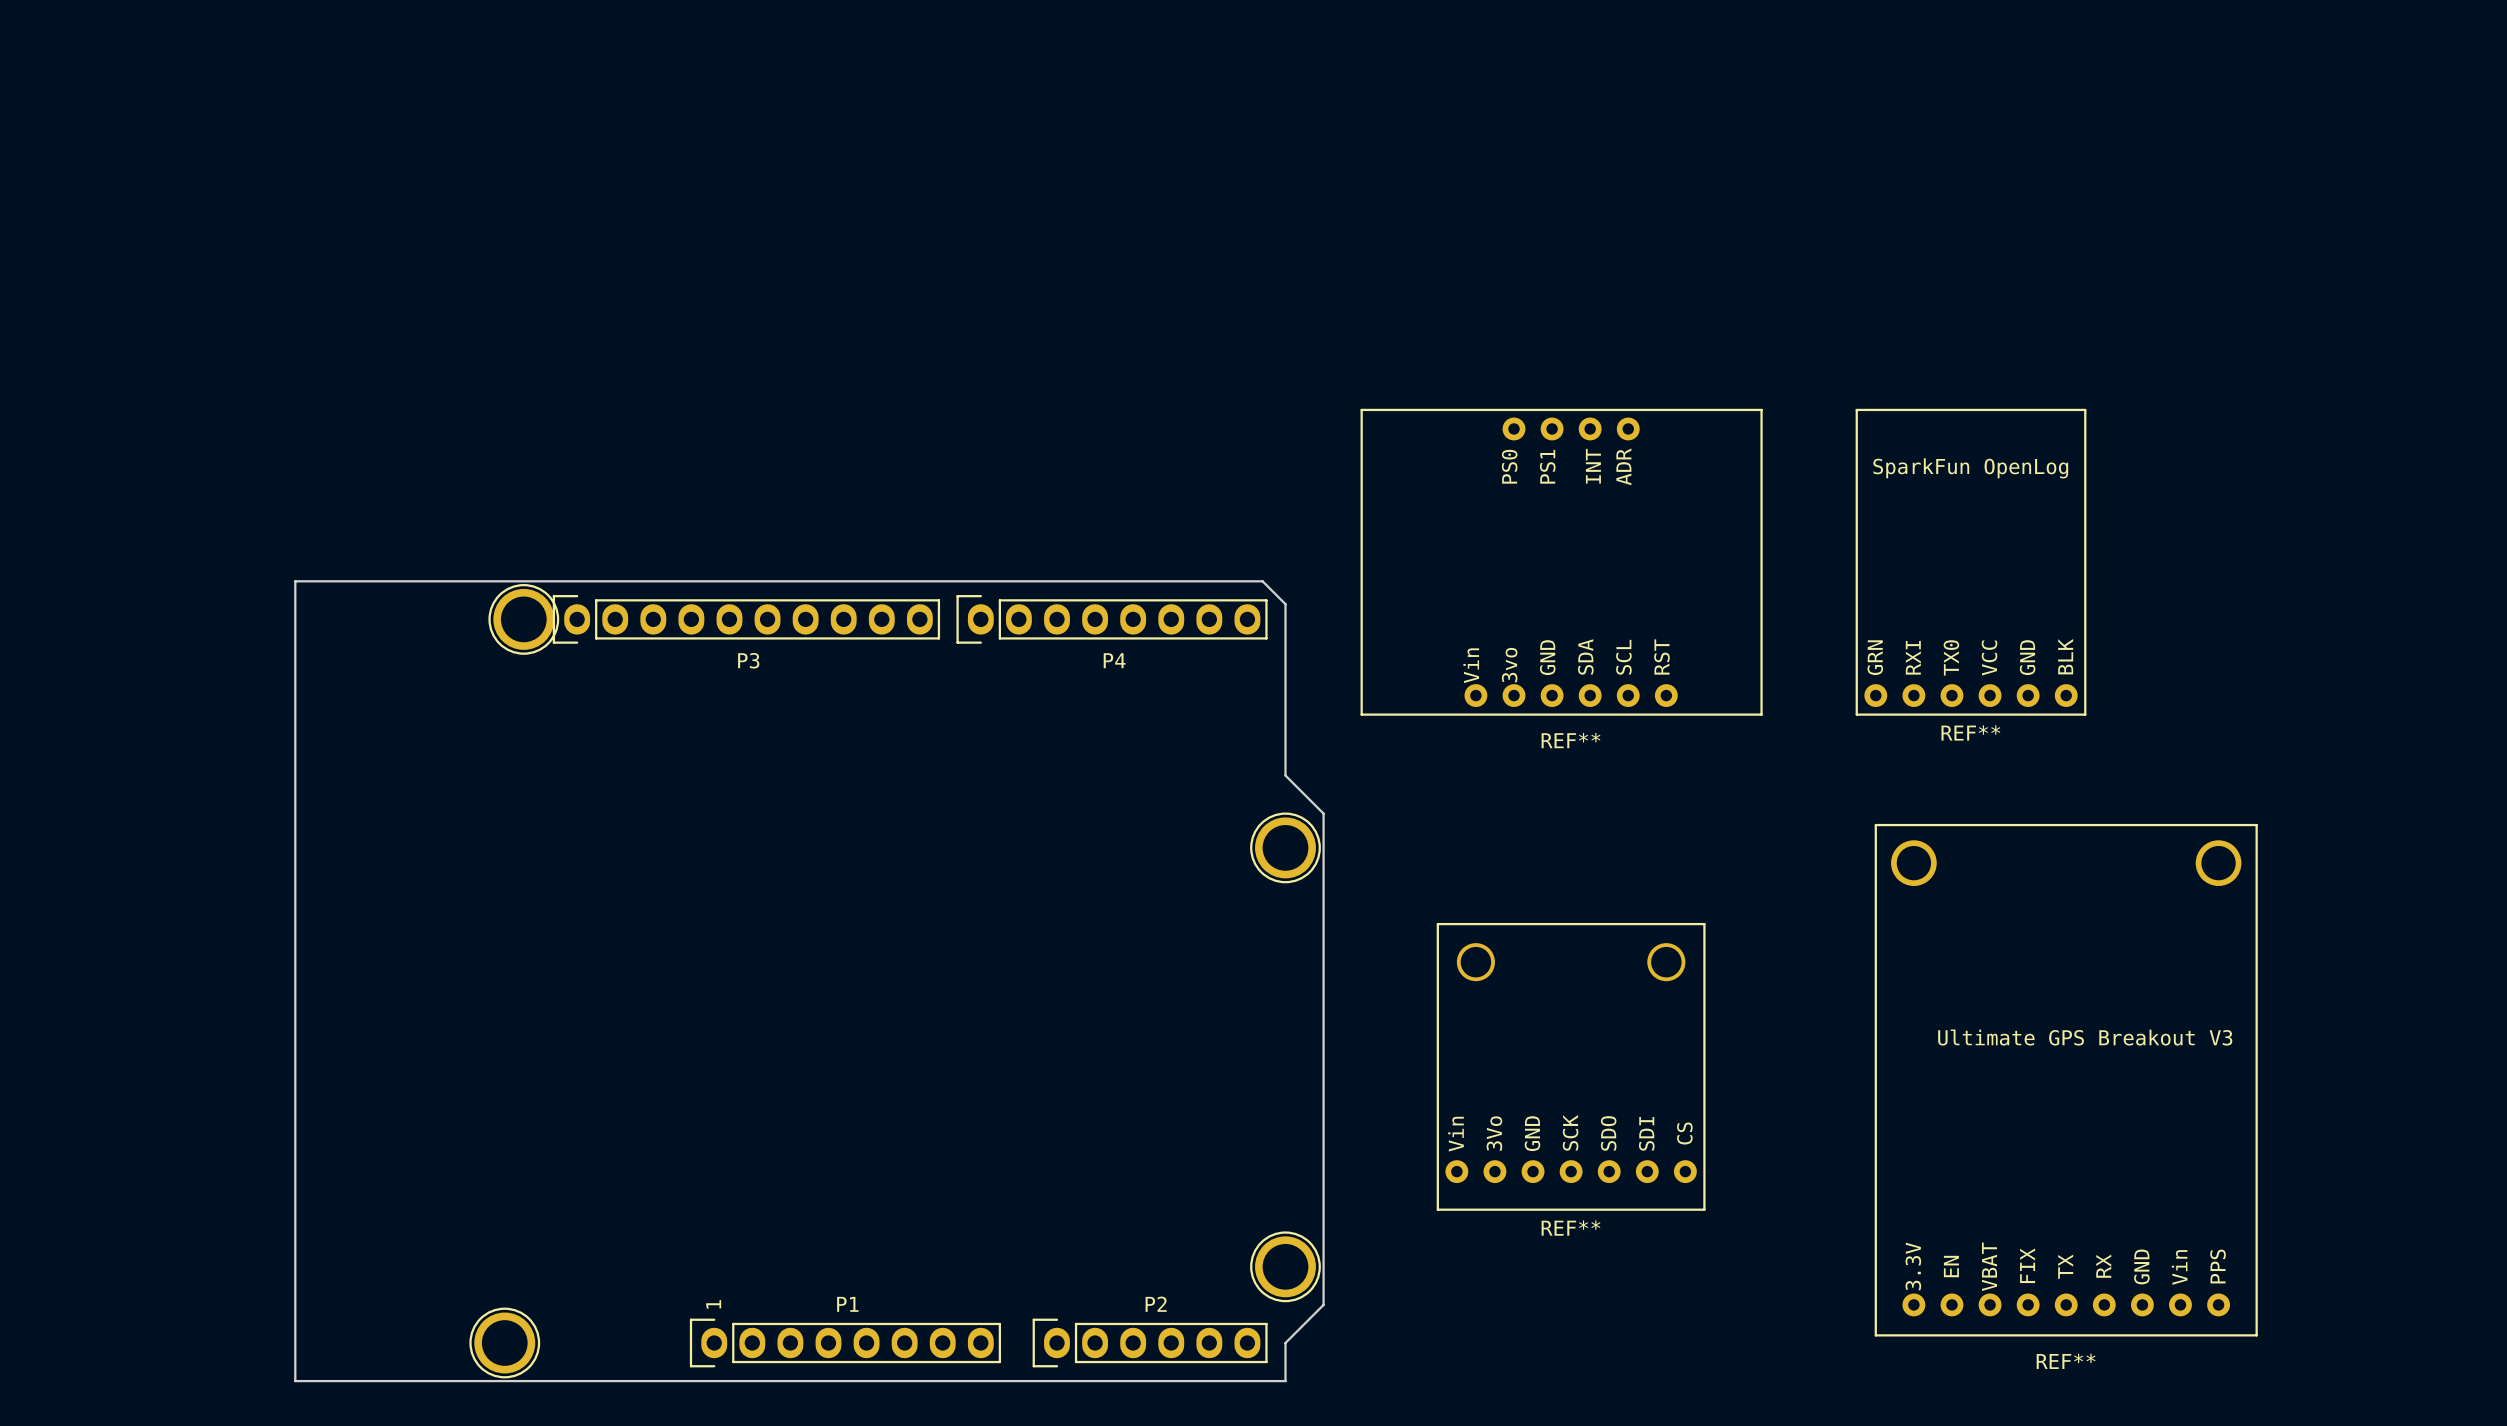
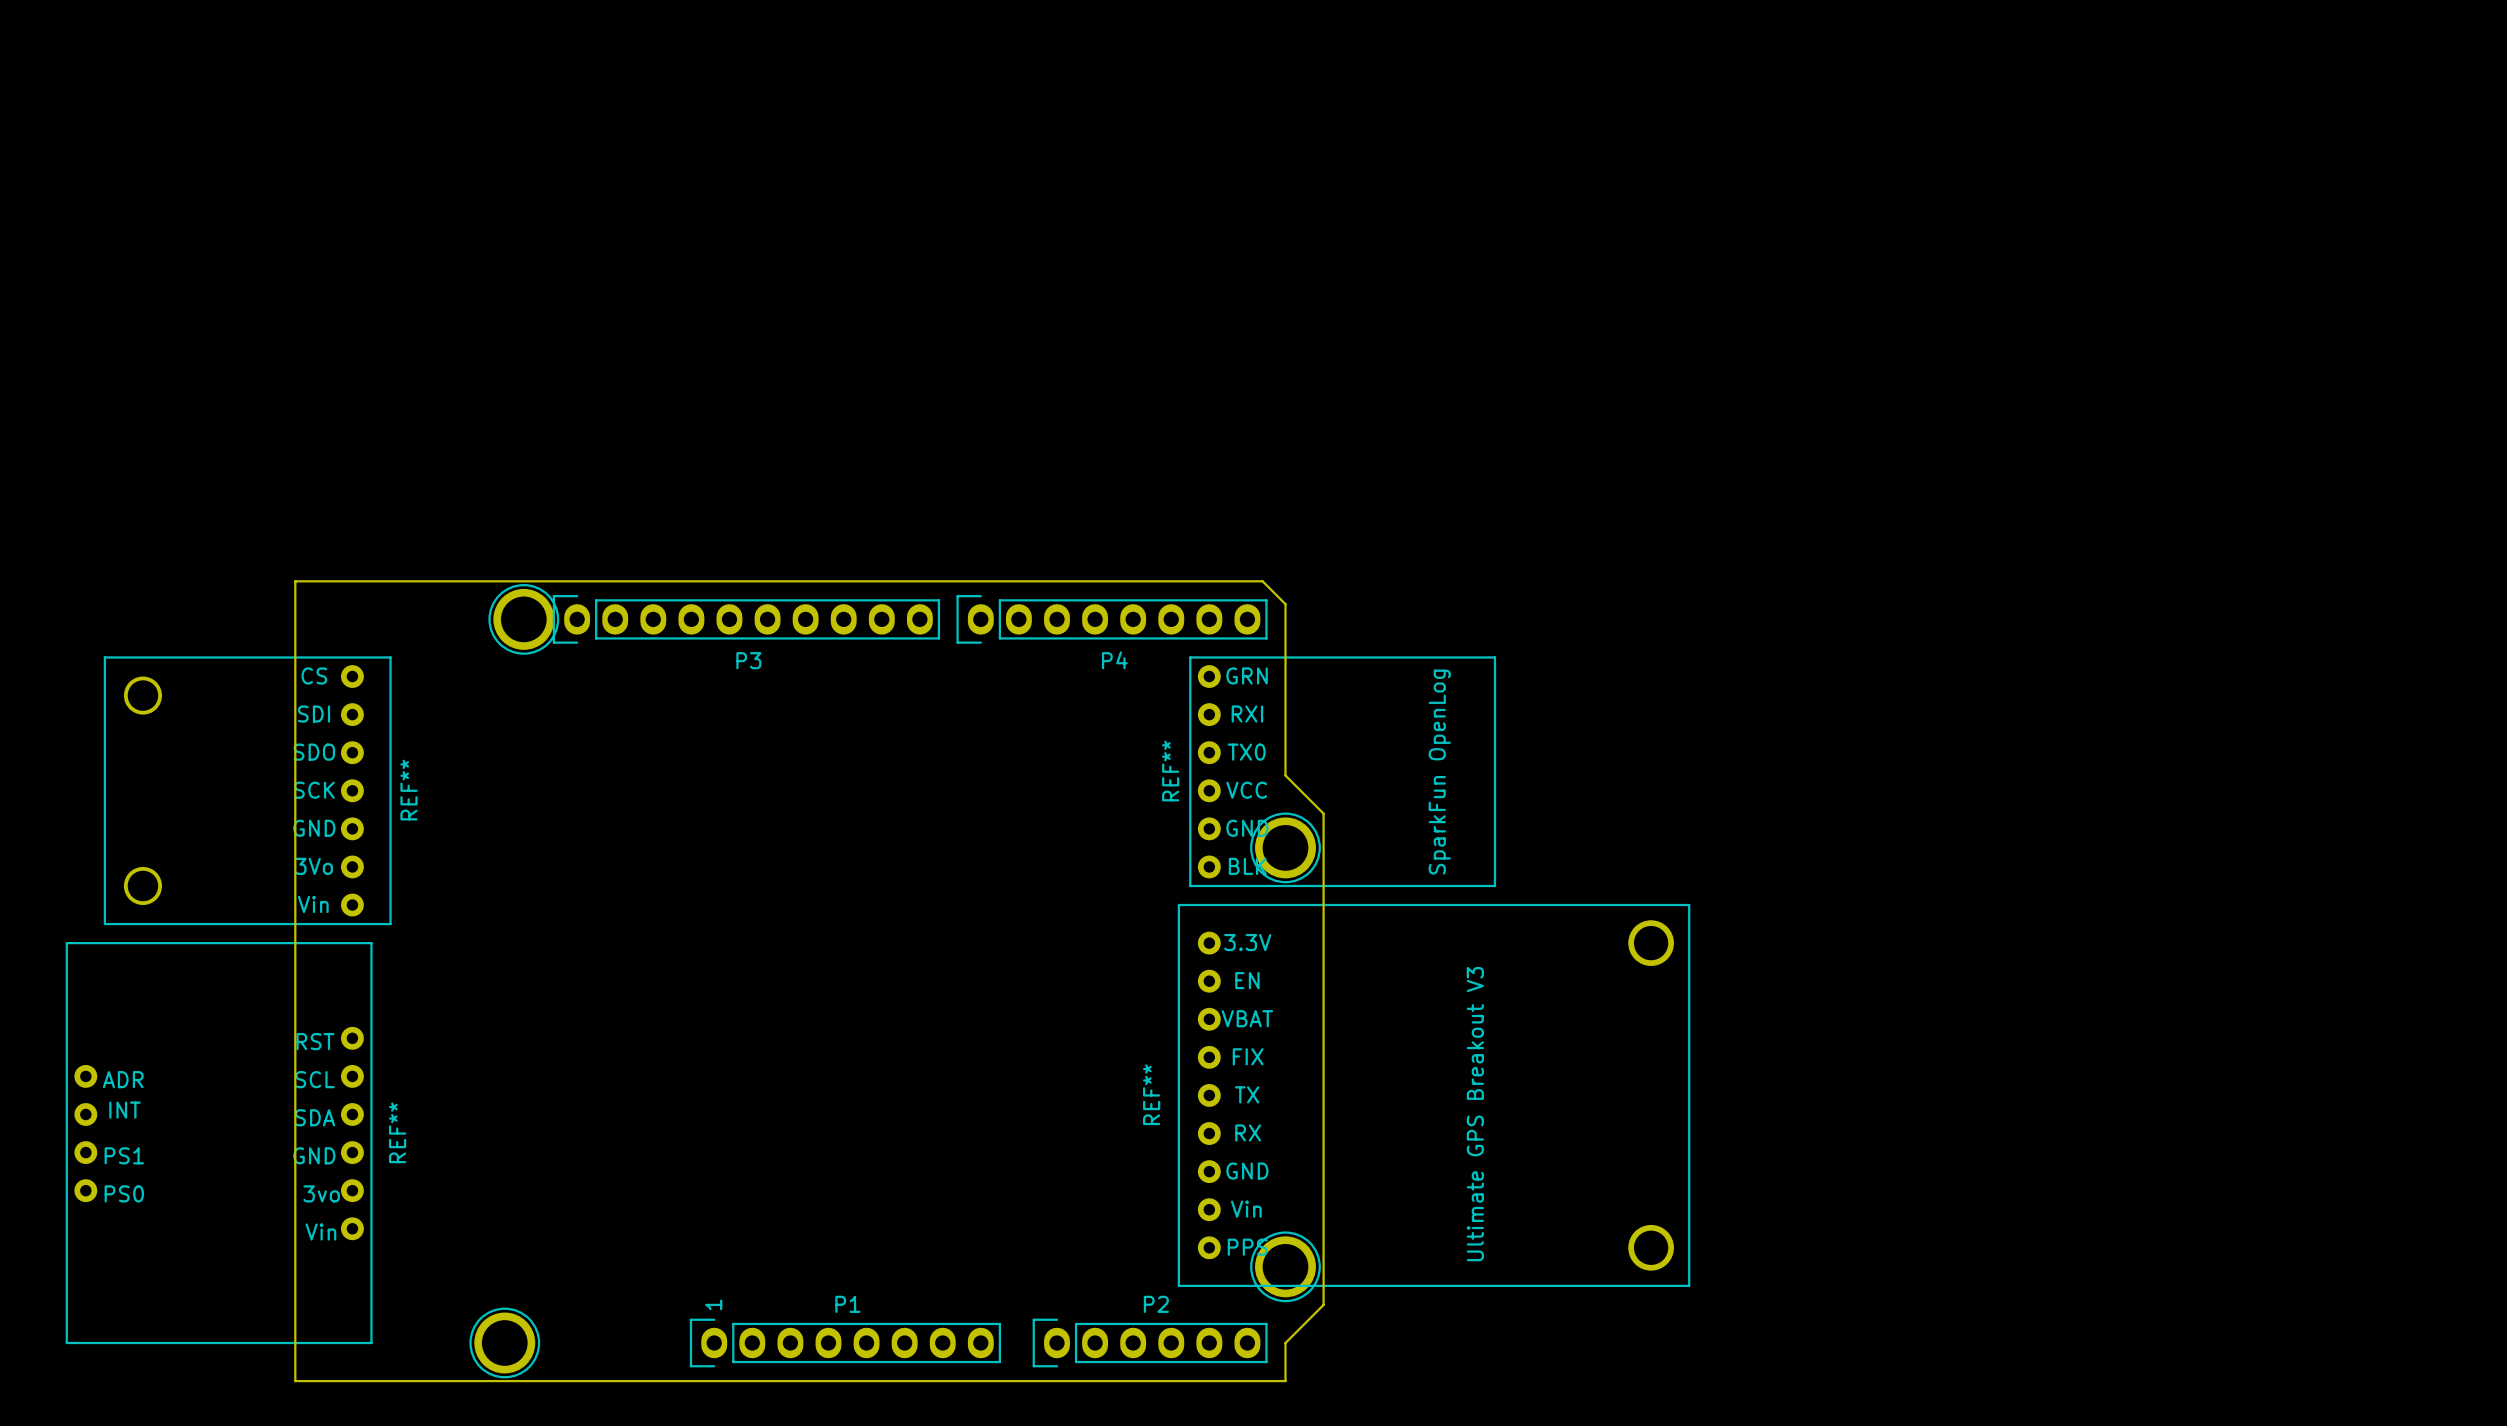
REF**: (1561, 562) -> none
REF**: (1971, 562) -> none
REF**: none -> (1342, 771)
REF**: none -> (247, 790)
REF**: (1571, 1066) -> none
REF**: (2066, 1080) -> none
REF**: none -> (1434, 1095)
REF**: none -> (219, 1143)

